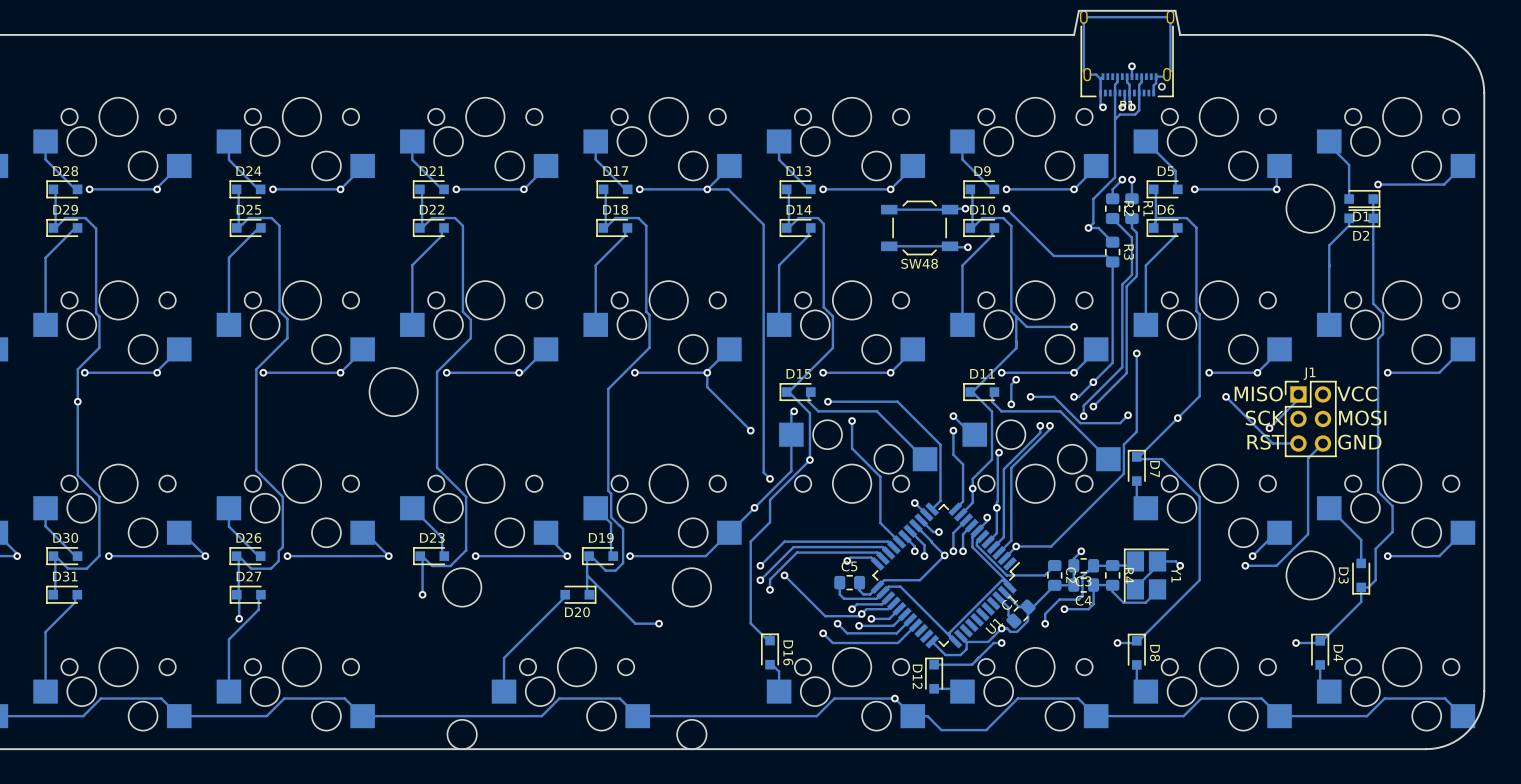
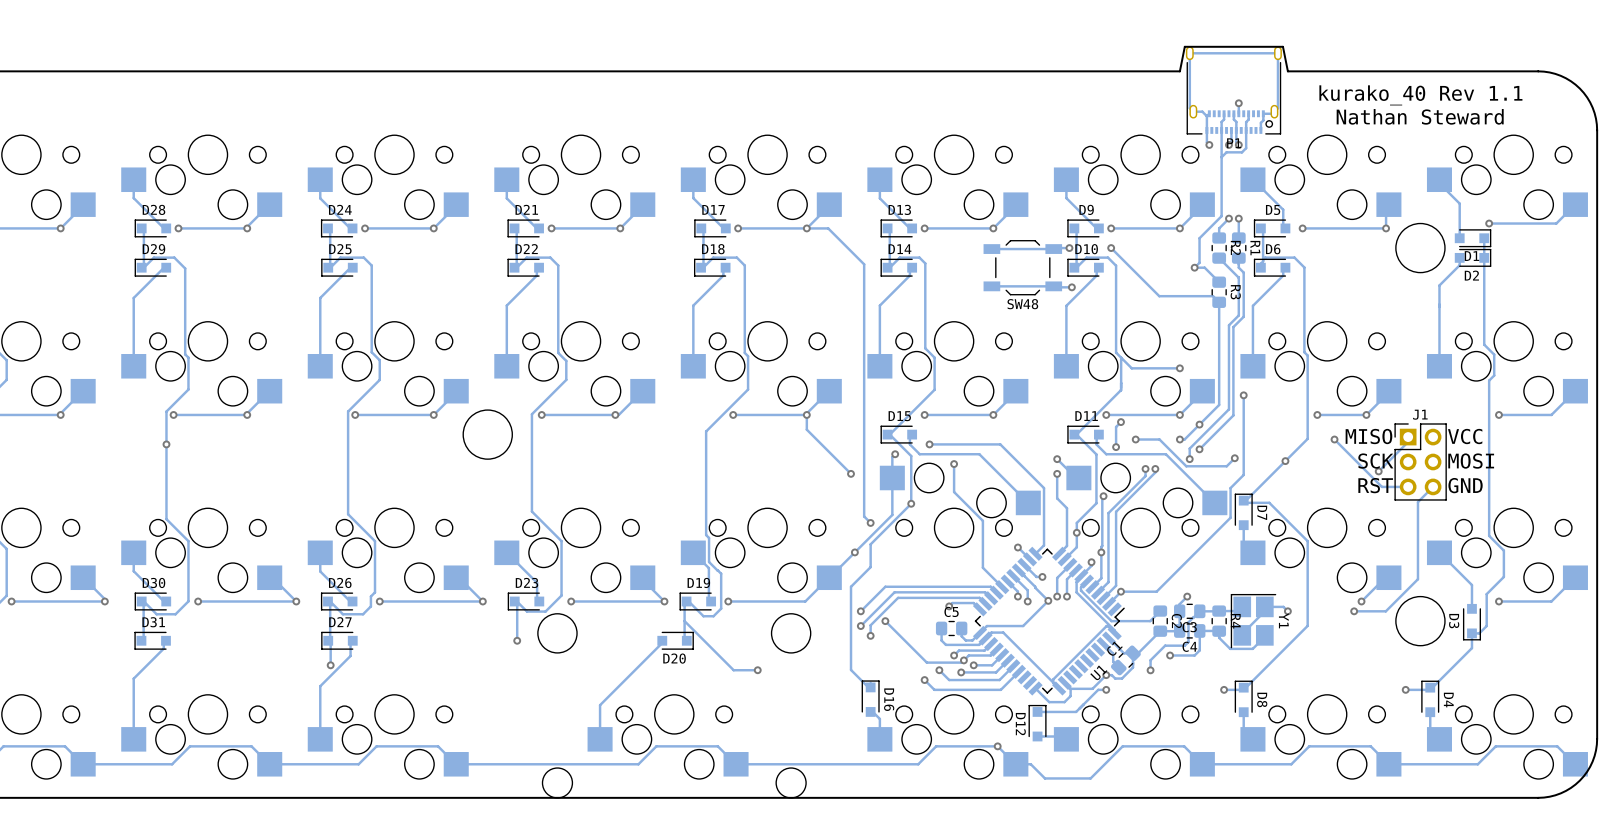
text: none -> kurako_40 Rev 1.1 (1420, 95)
text: none -> Nathan Steward (1420, 116)

